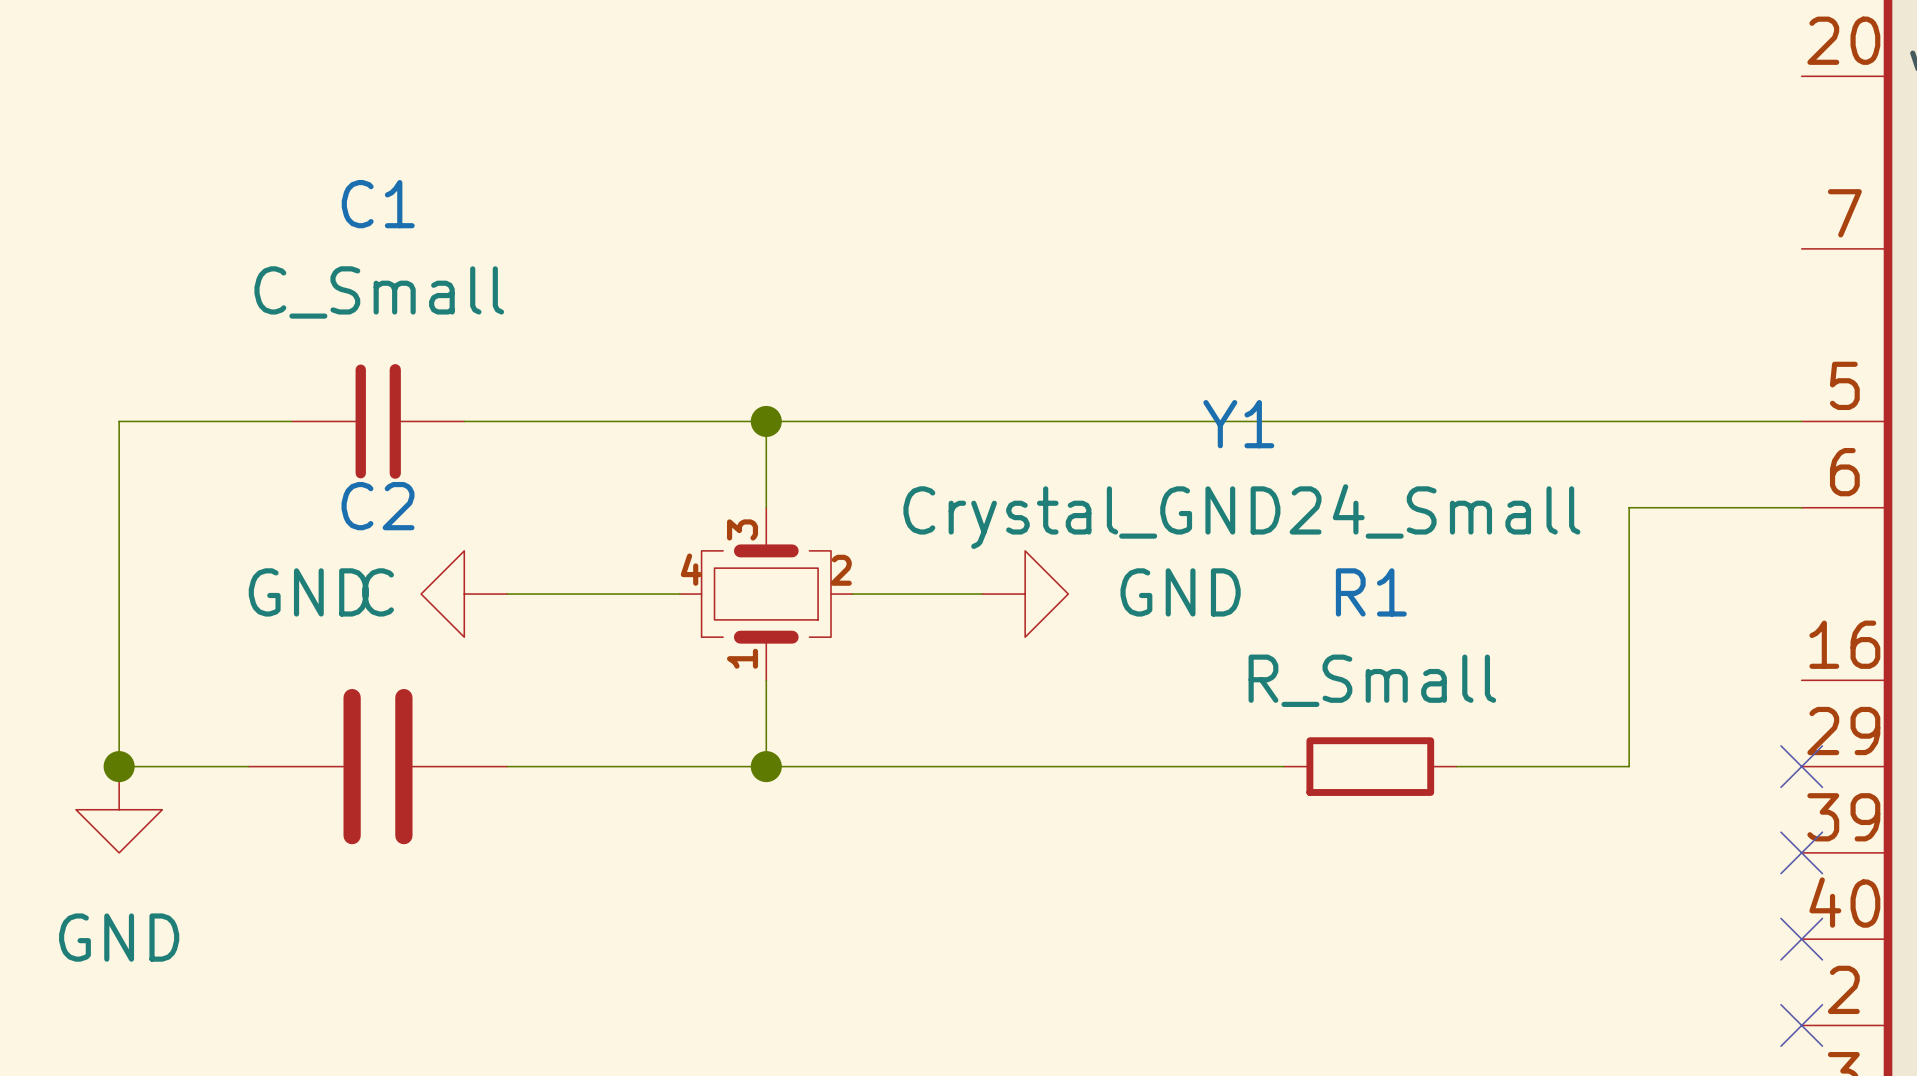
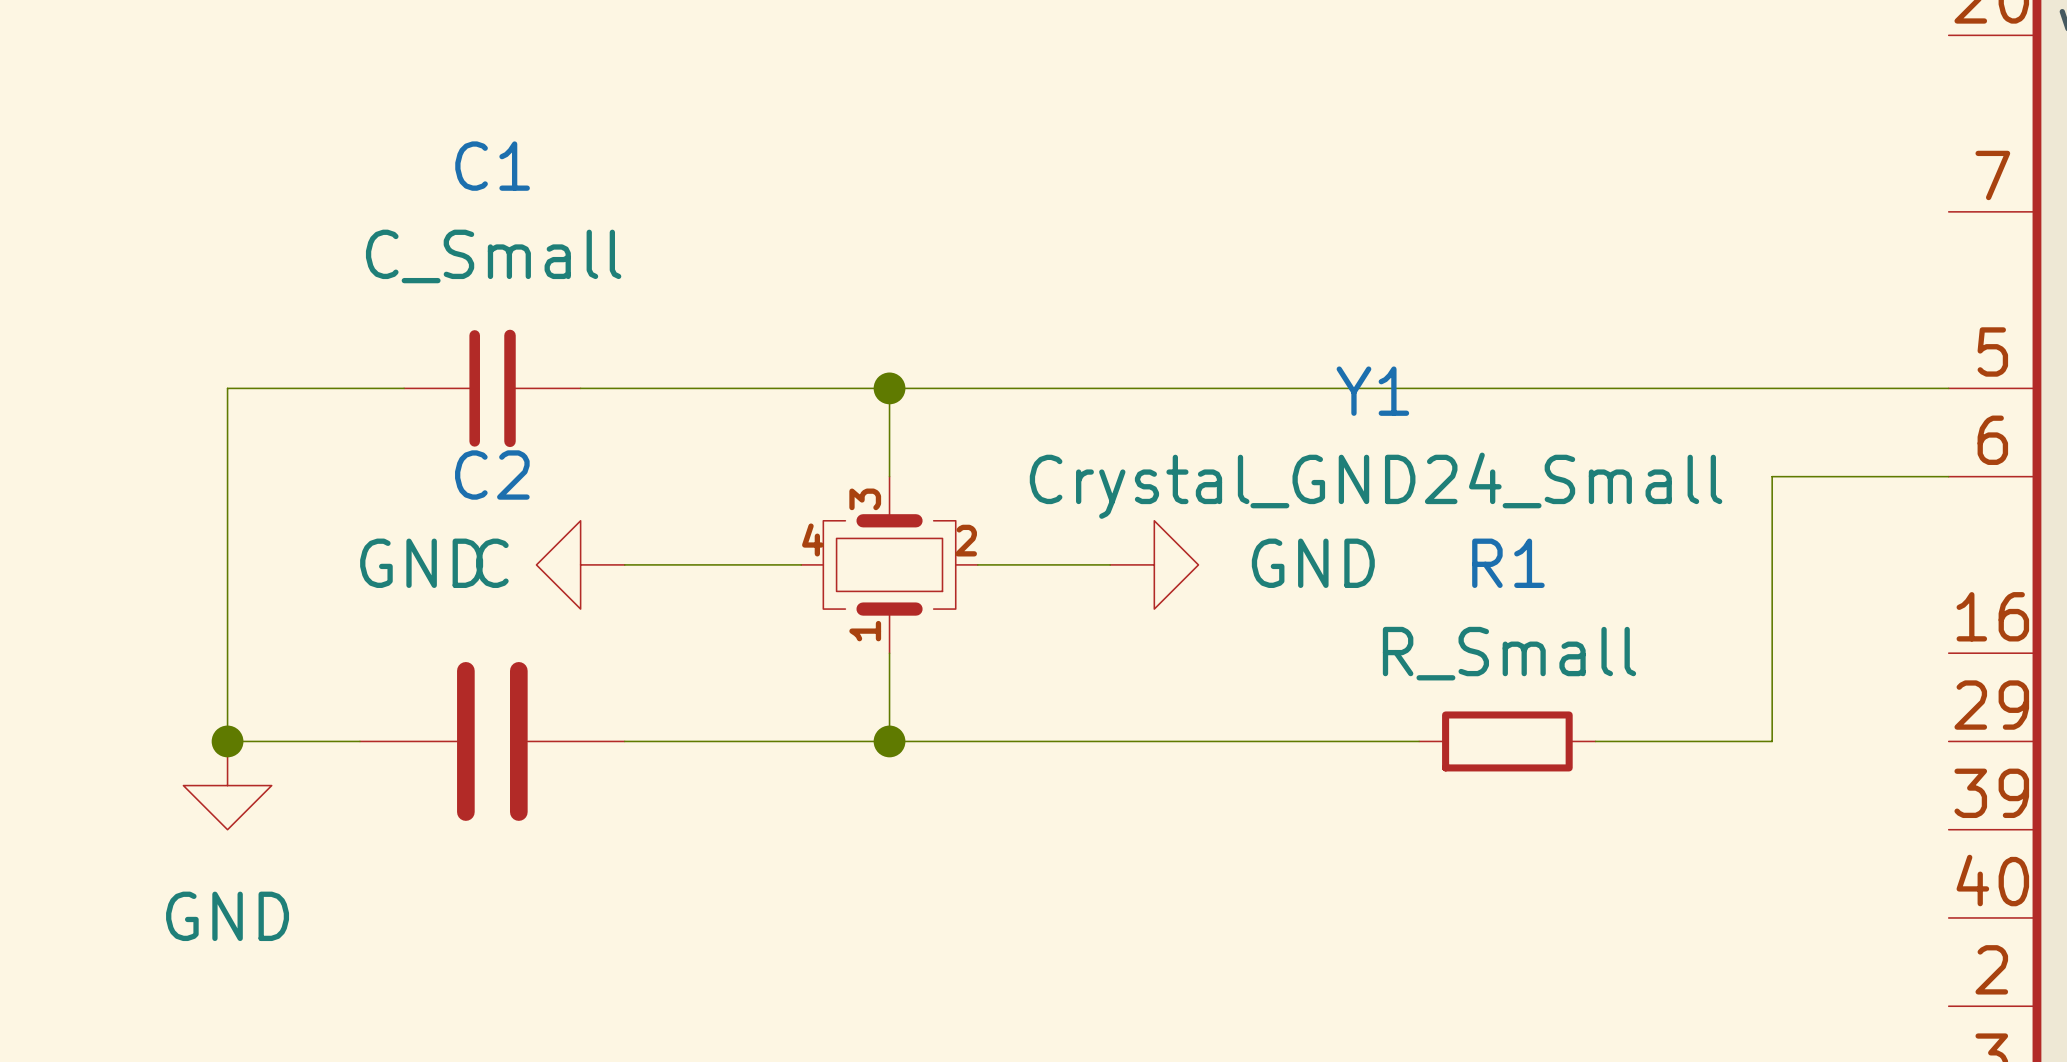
no-connect mark: (1801, 766) -> none
no-connect mark: (1801, 852) -> none
no-connect mark: (1801, 939) -> none
no-connect mark: (1801, 1025) -> none

